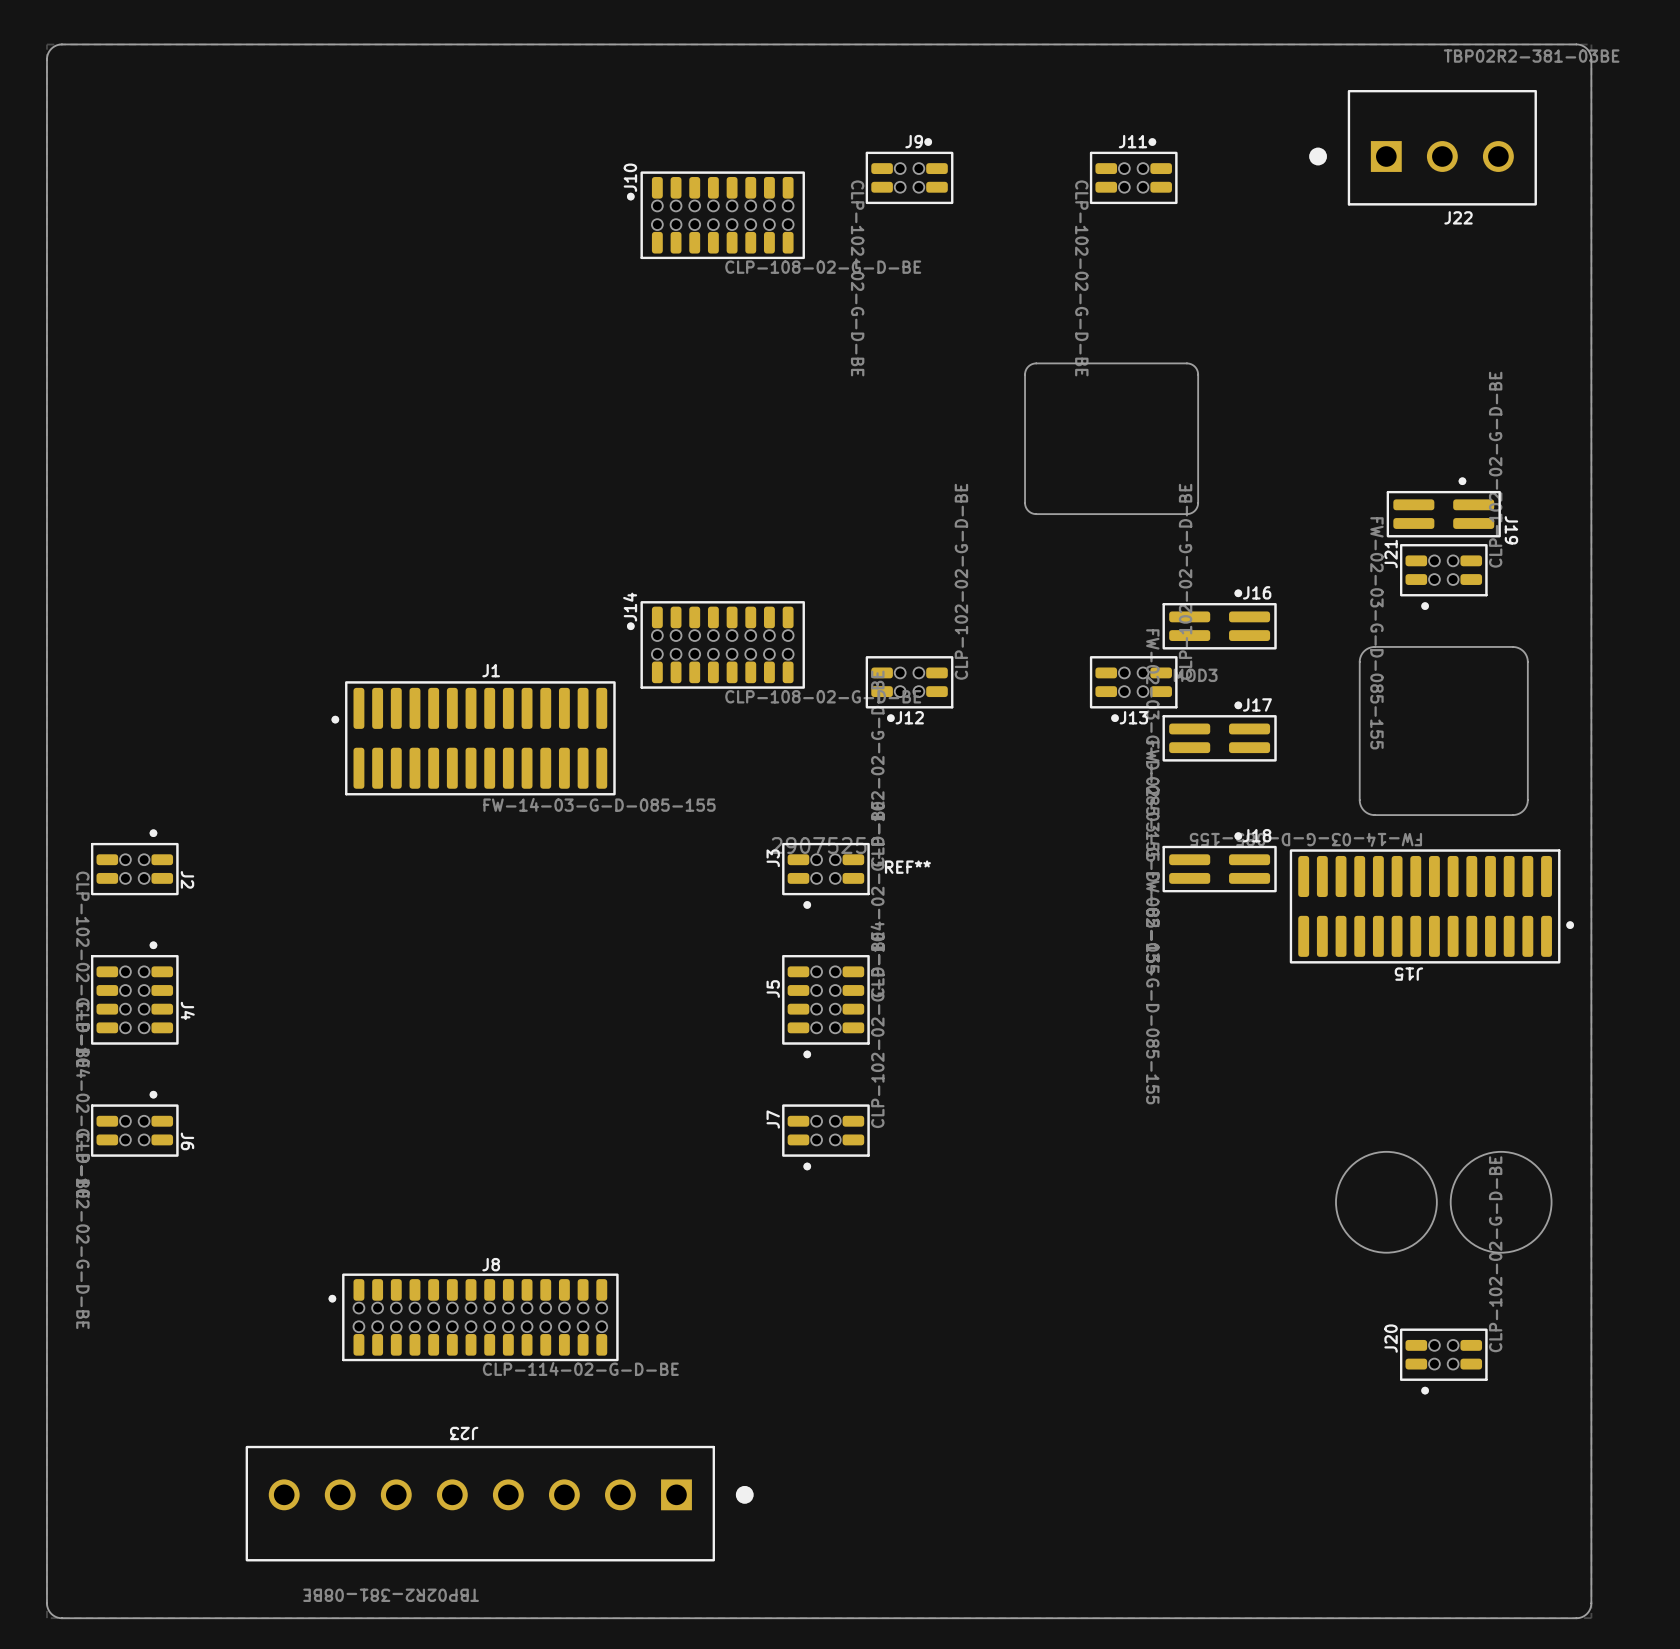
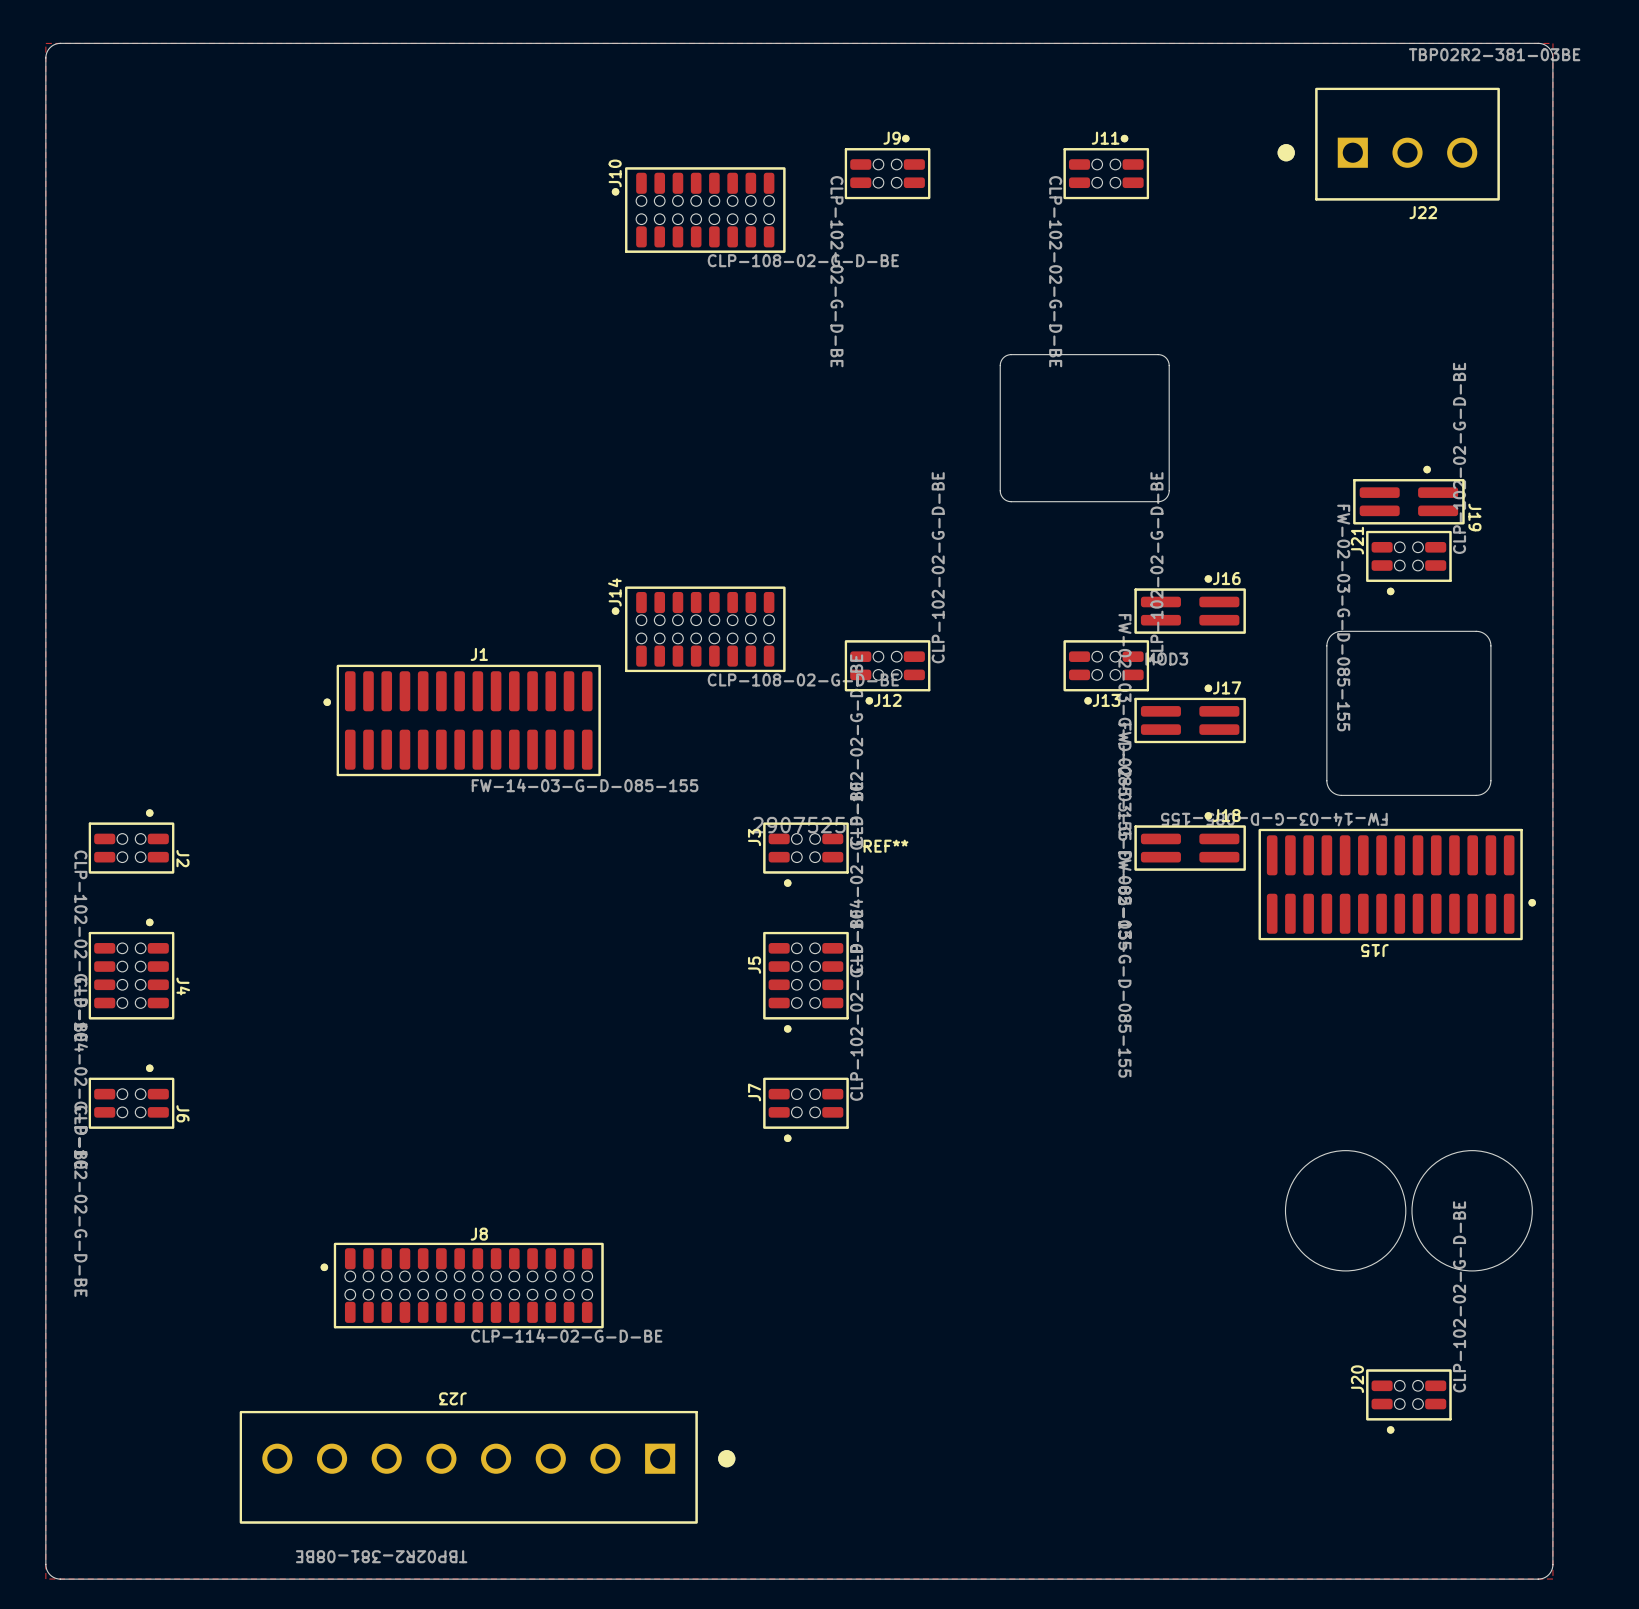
drawing: none -> [1285, 630, 1533, 1272]
drawing: [1335, 646, 1552, 1254] -> none
J20 position: (1443, 1361) -> (1408, 1401)

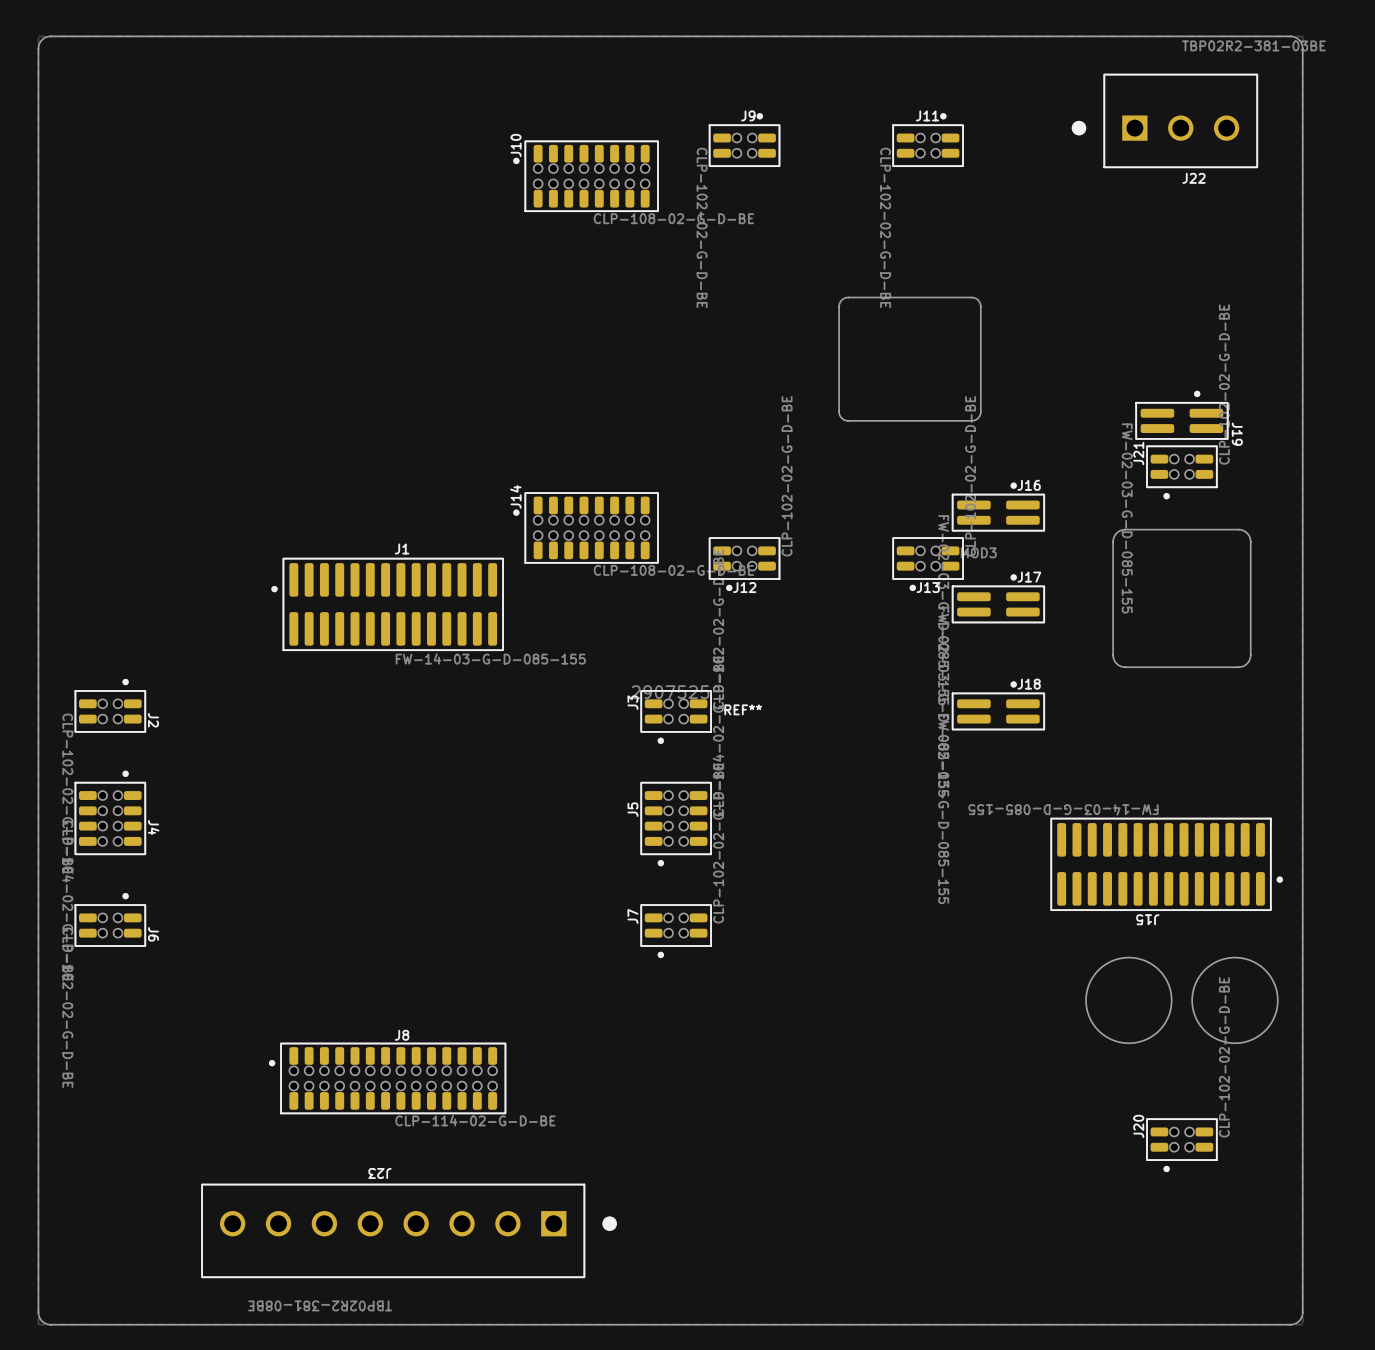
drawing shape: [1285, 630, 1533, 1272] -> [1085, 529, 1279, 1044]
J15 position: (1397, 884) -> (1166, 864)
J20 position: (1408, 1401) -> (1181, 1145)

